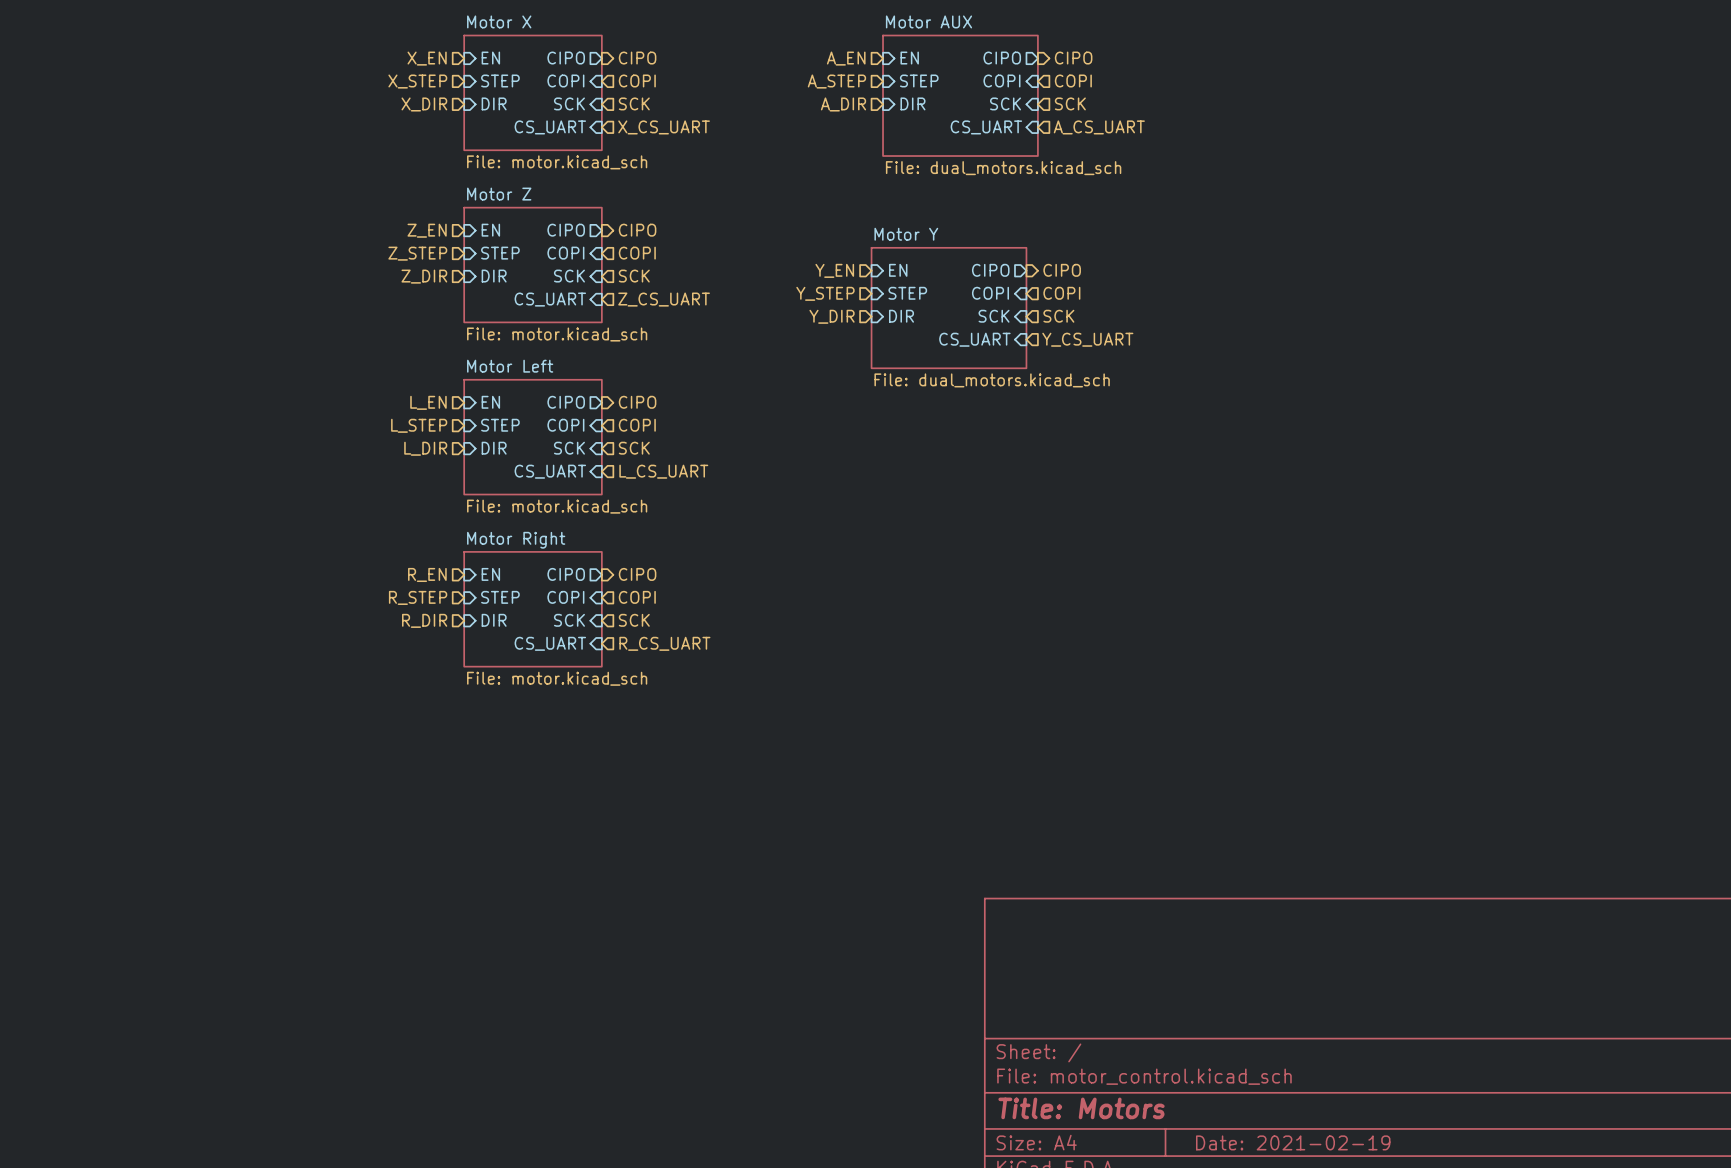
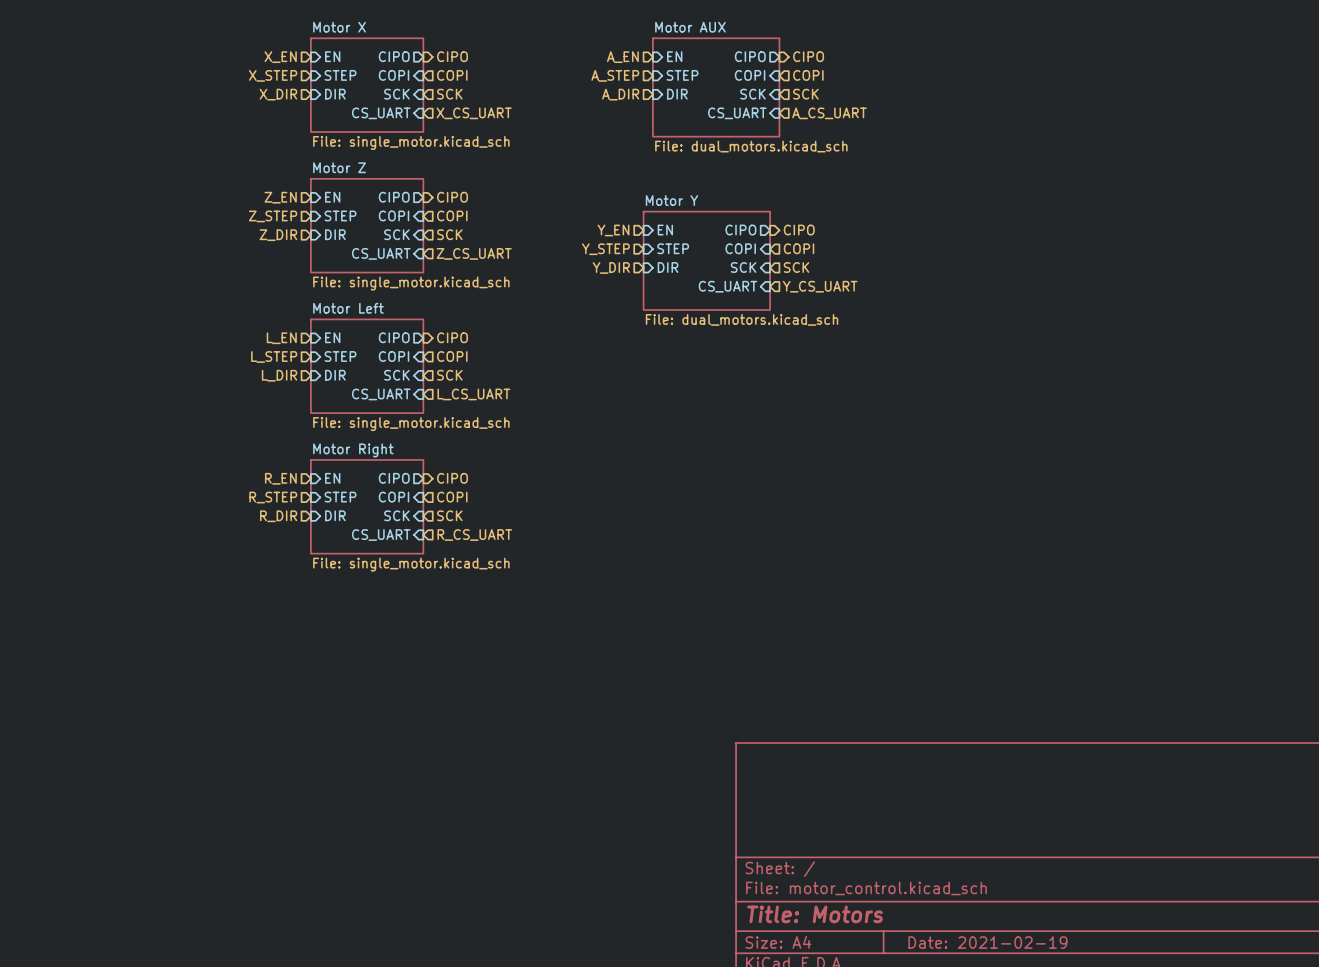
sheet Motor X value: File: motor.kicad_sch (557, 162) -> File: single_motor.kicad_sch (411, 143)
sheet Motor Z value: File: motor.kicad_sch (557, 334) -> File: single_motor.kicad_sch (411, 283)
sheet Motor Left value: File: motor.kicad_sch (557, 506) -> File: single_motor.kicad_sch (411, 424)
sheet Motor Right value: File: motor.kicad_sch (557, 678) -> File: single_motor.kicad_sch (411, 564)

